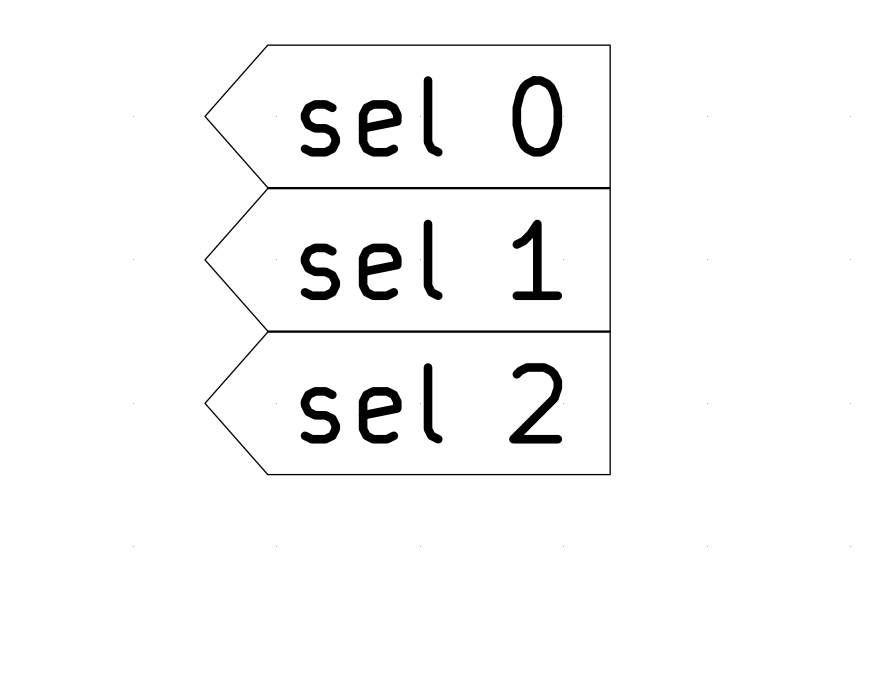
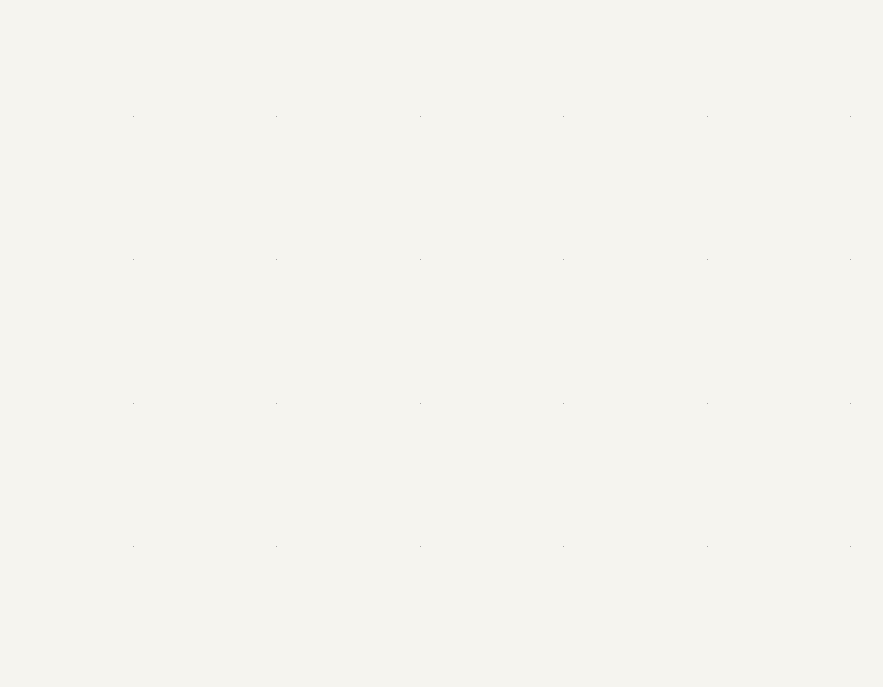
global label: sel 0 (431, 116) -> none
global label: sel 1 (431, 259) -> none
global label: sel 2 (431, 403) -> none

